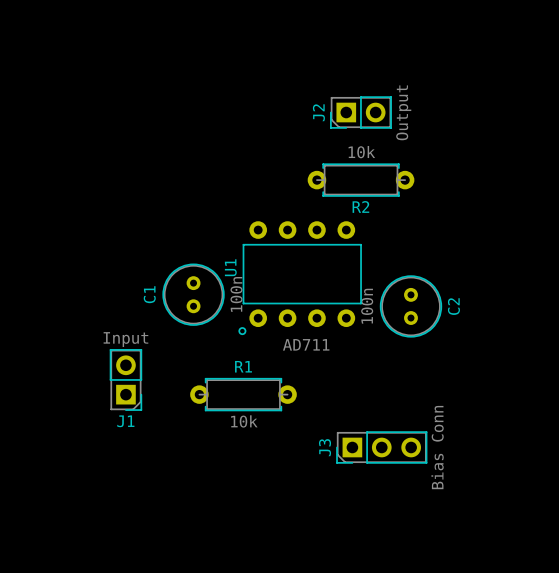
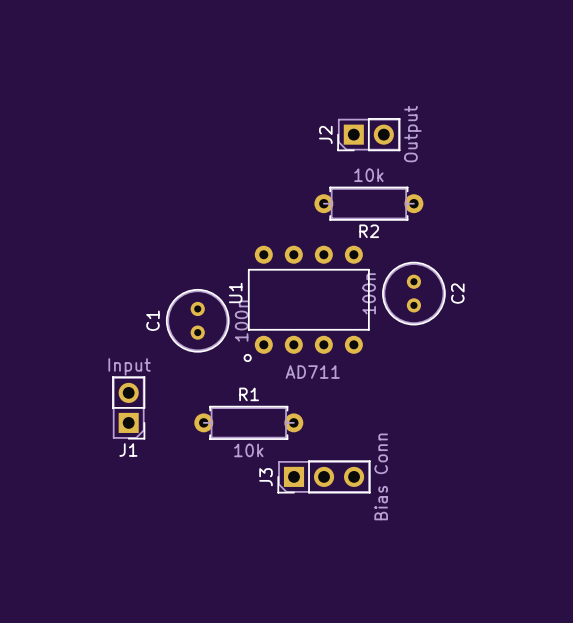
C2 position: (410, 306) -> (413, 293)
J3 position: (381, 447) -> (324, 476)

